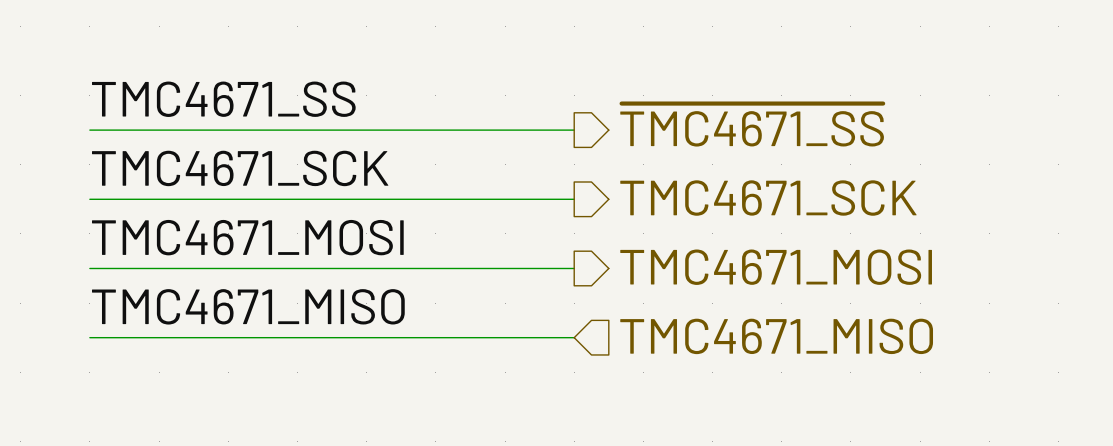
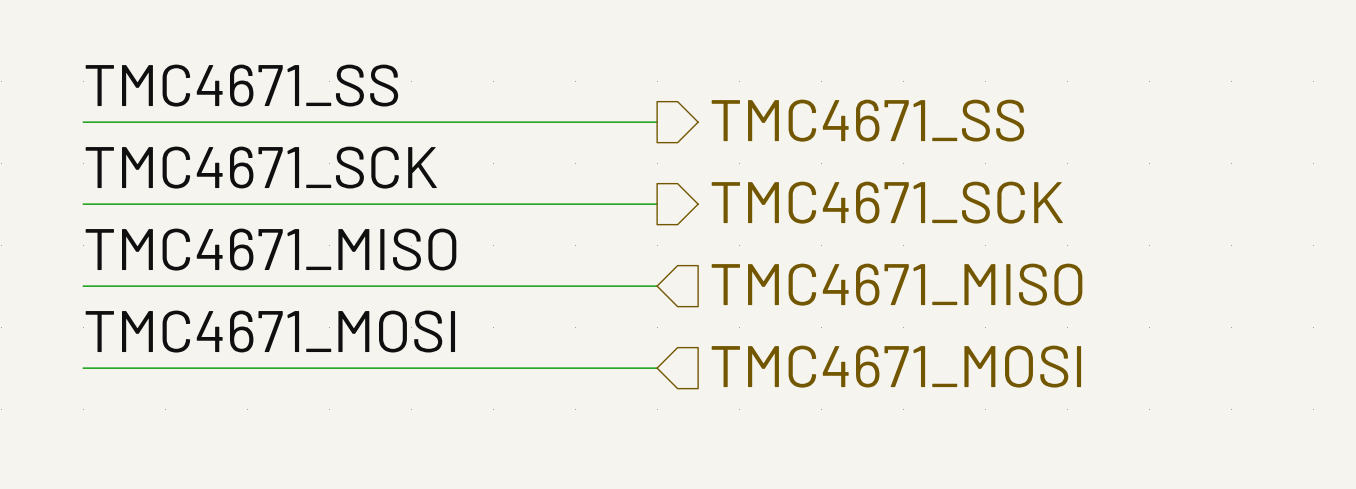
hierarchical label: ~{TMC4671_SS} (752, 125) -> TMC4671_SS (867, 120)
label: TMC4671_MOSI (247, 237) -> TMC4671_MISO (270, 249)
hierarchical label shape: output (776, 267) -> input (897, 284)
hierarchical label: TMC4671_MOSI (776, 267) -> TMC4671_MISO (897, 284)
label: TMC4671_MISO (248, 306) -> TMC4671_MOSI (270, 331)
hierarchical label: TMC4671_MISO (776, 336) -> TMC4671_MOSI (896, 366)

